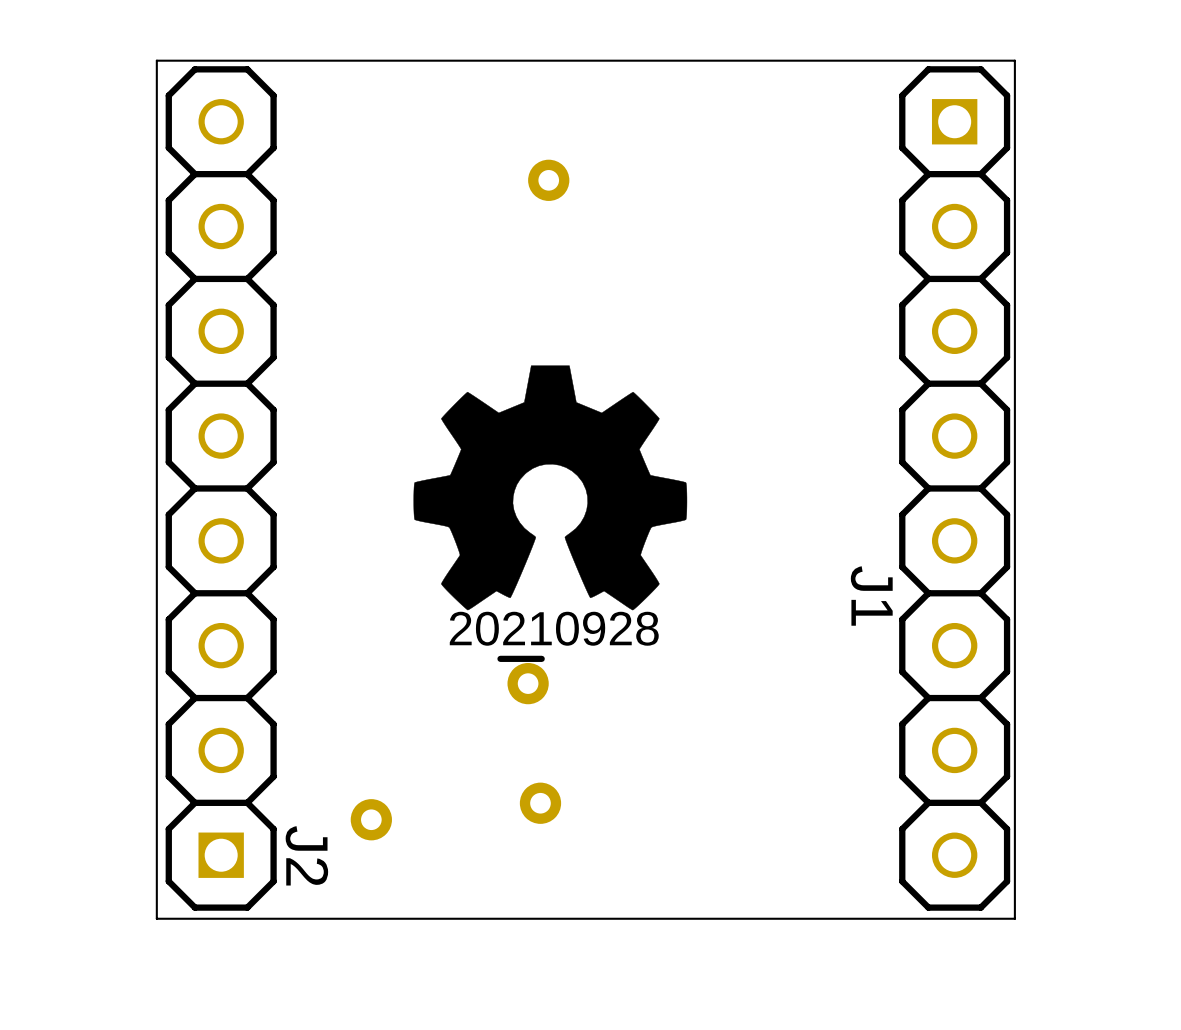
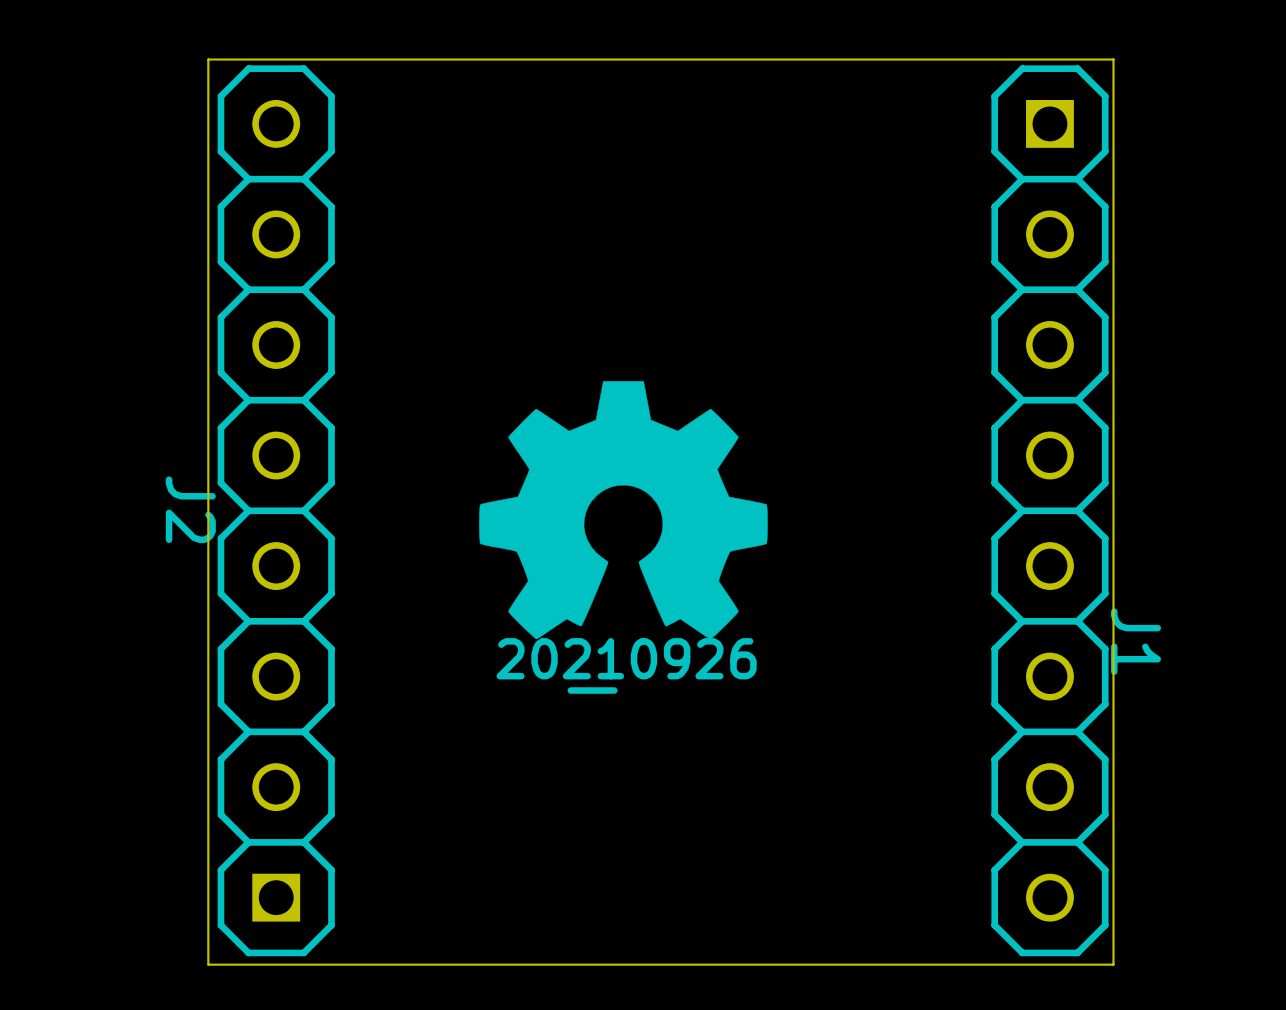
part: (548, 180) -> none
J1 name position: J1 (871, 595) -> J1 (1136, 641)
drawing shape: [449, 611, 659, 662] -> [496, 638, 757, 694]
part: (528, 683) -> none
part: (540, 803) -> none
part: (371, 819) -> none
J2 name position: J2 (306, 855) -> J2 (190, 509)

